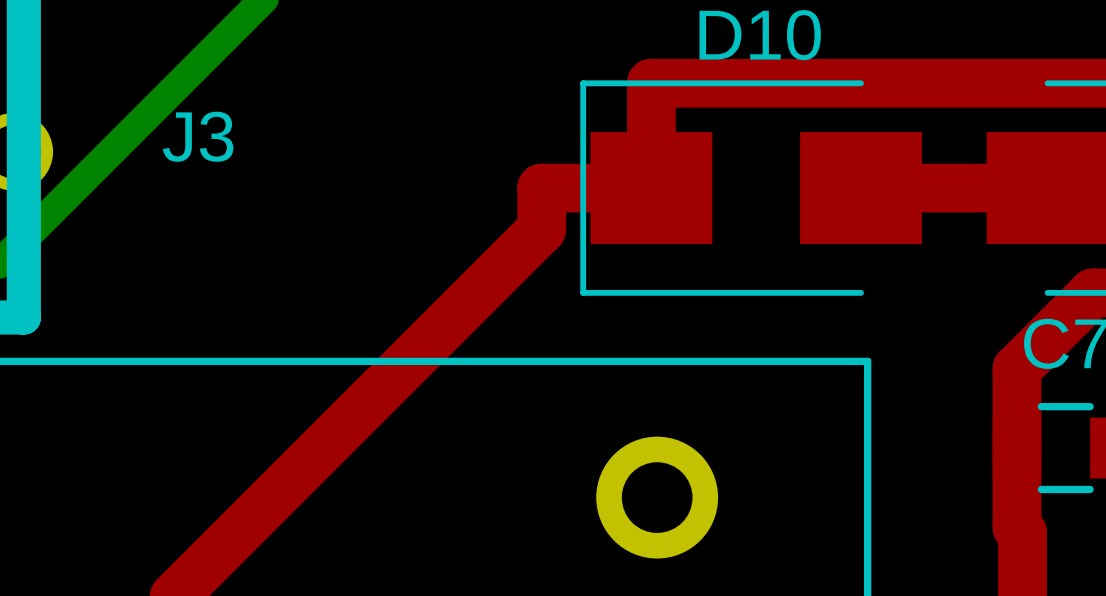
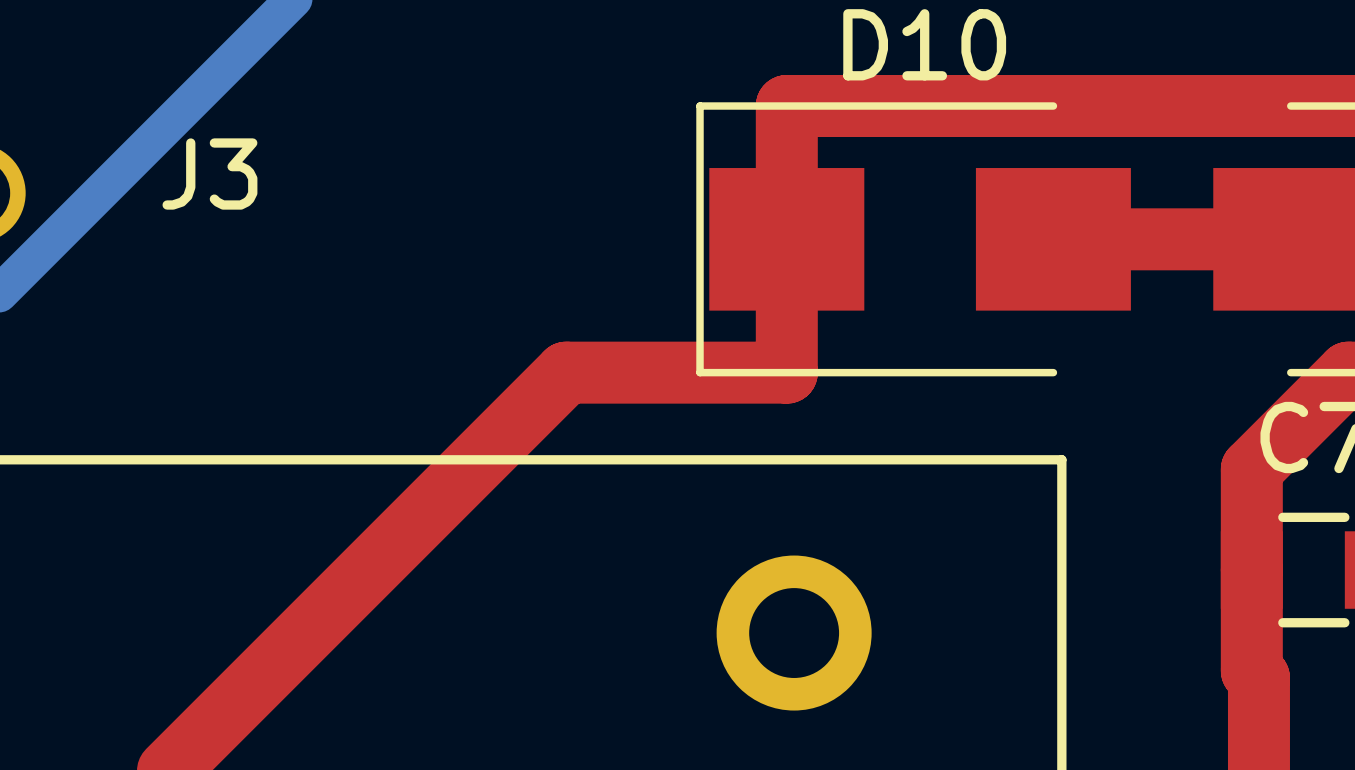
top track: (651, 188) (541, 188) (541, 229) (478, 292) -> (786, 239) (786, 372) (566, 372)

